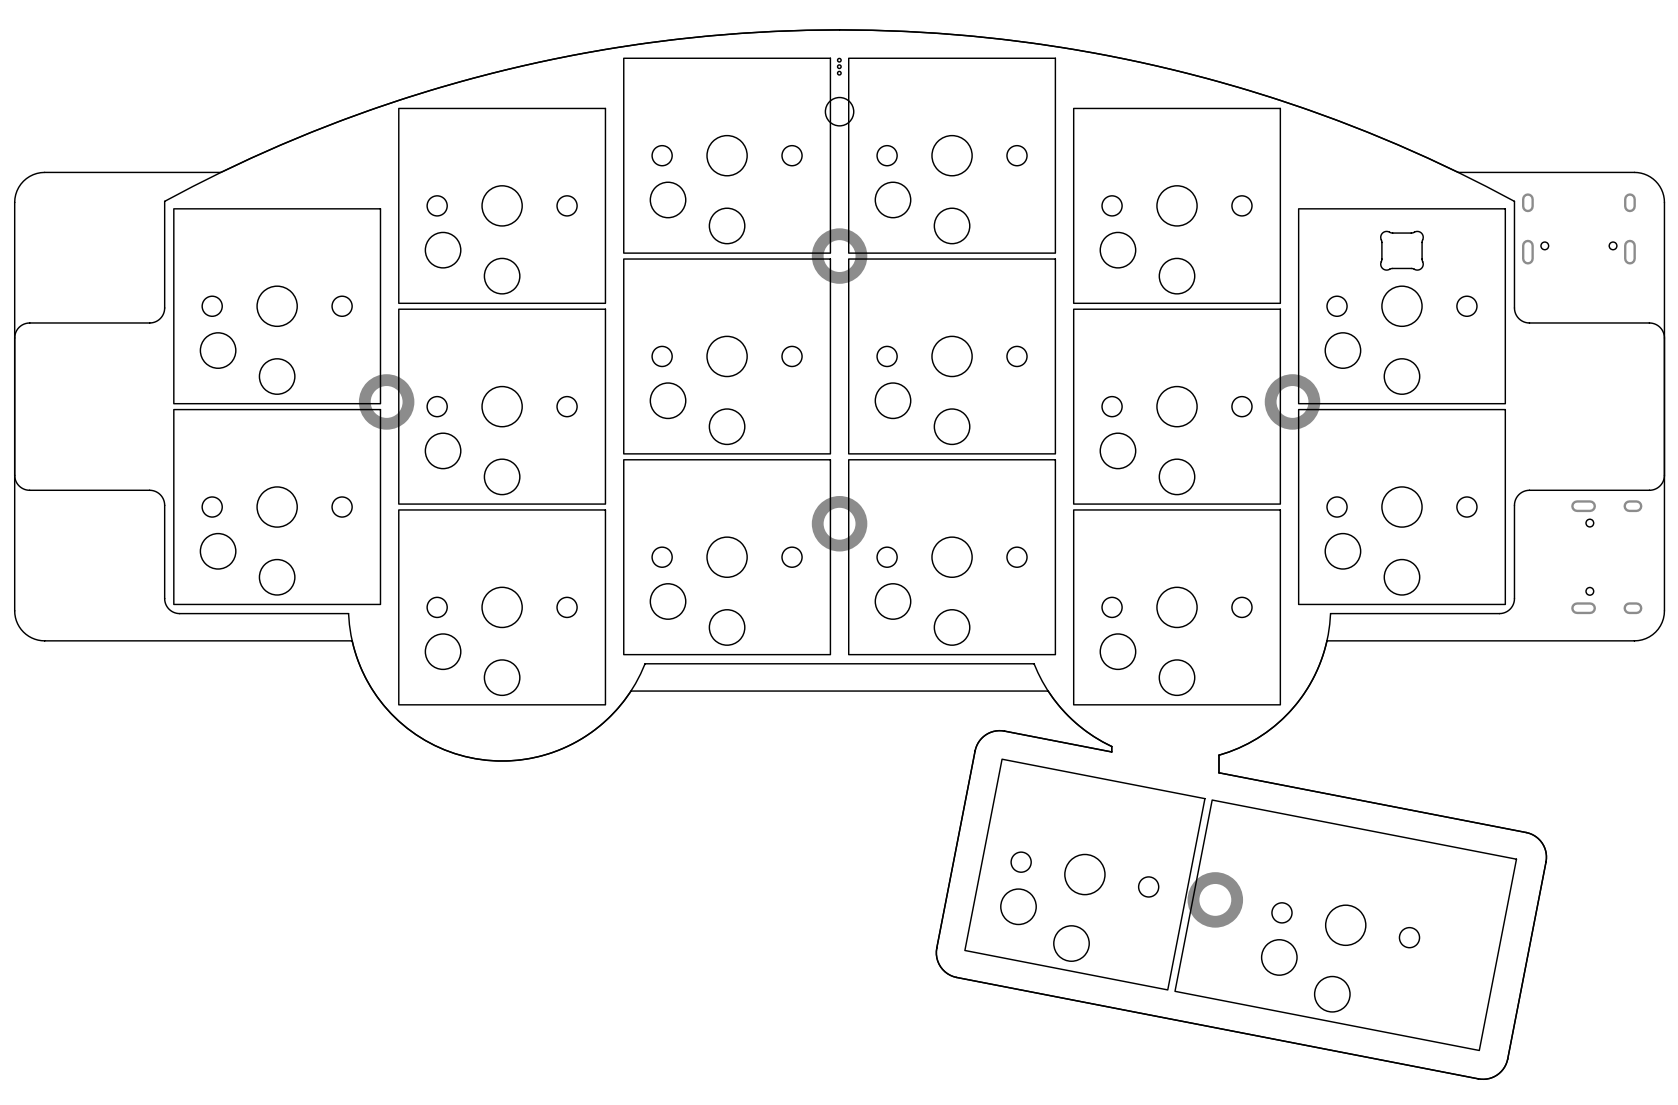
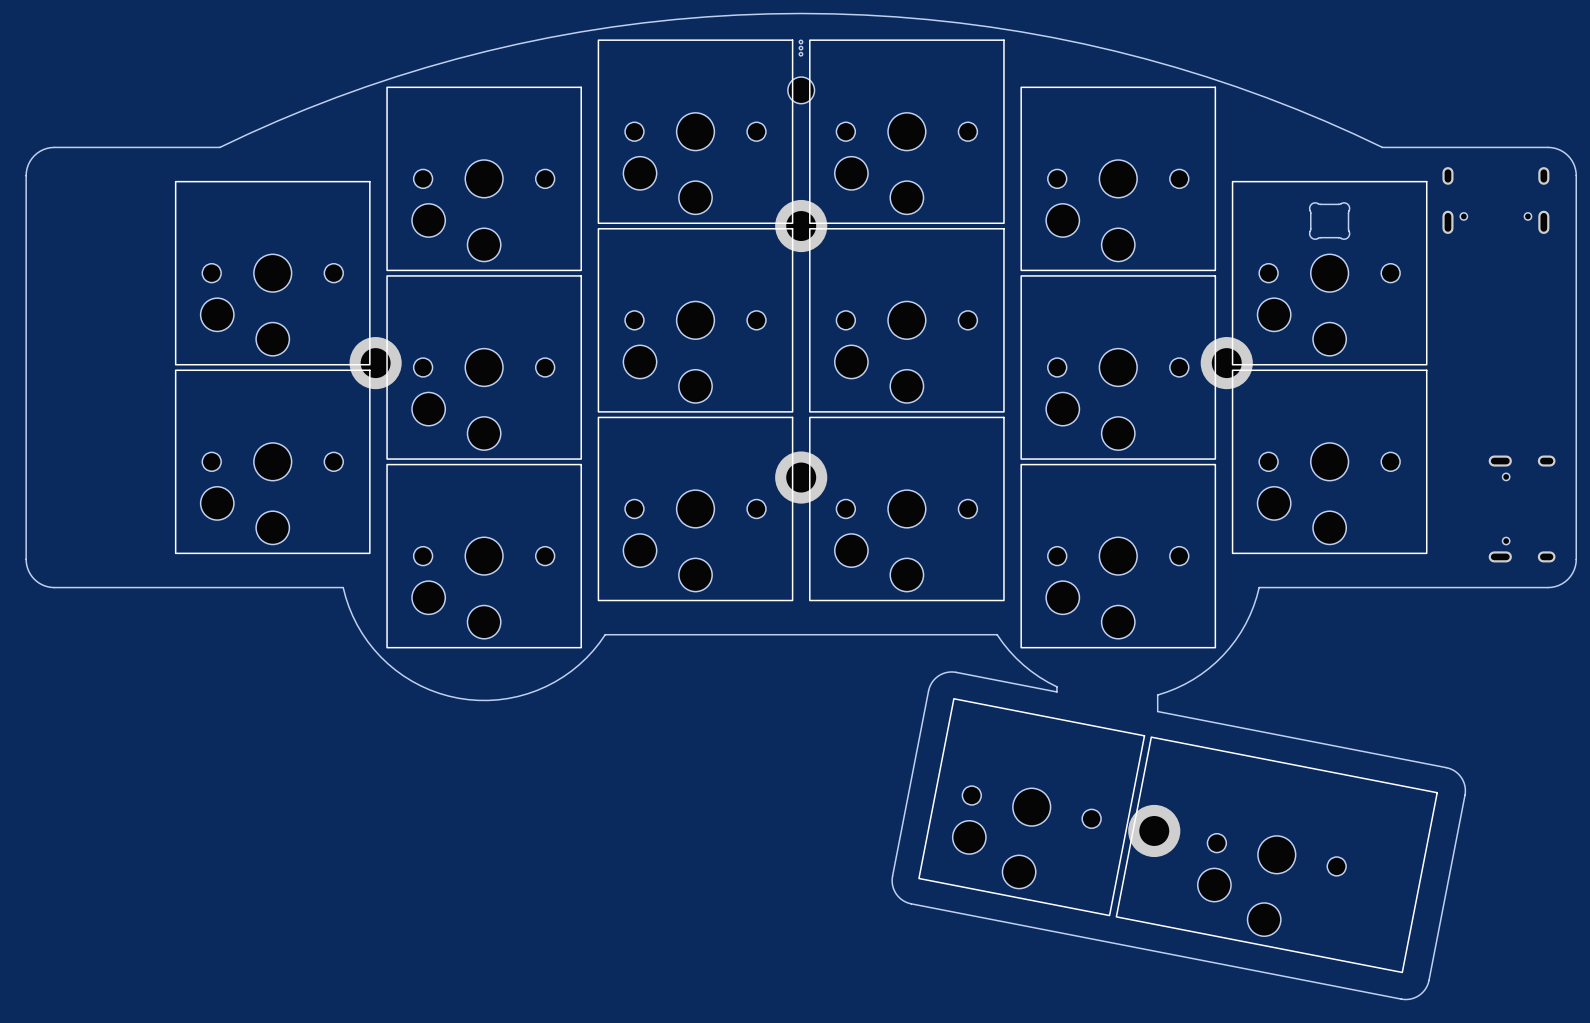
line: (839, 29) (967, 35) (1062, 47) (1187, 73) (1310, 110) (1428, 158) (1514, 201) (1514, 307) (1516, 315) (1521, 320) (1529, 322) (1651, 323) (1662, 330) (1664, 337) (1664, 475) (1660, 485) (1649, 490) (1529, 490) (1521, 492) (1517, 496) (1514, 503) (1514, 598) (1512, 606) (1508, 610) (1499, 613) (1330, 613) (1325, 645) (1319, 665) (1297, 702) (1266, 732) (1248, 743) (1218, 755) (1218, 772) (1526, 832) (1540, 840) (1545, 850) (1546, 861) (1507, 1059) (1503, 1069) (1497, 1075) (1489, 1078) (1478, 1078) (956, 977) (944, 971) (937, 960) (936, 948) (975, 750) (979, 740) (990, 732) (1001, 730) (1111, 751) (1111, 746) (1079, 725) (1058, 705) (1042, 681) (1034, 663) (645, 663) (629, 693) (616, 710) (600, 725) (572, 743) (552, 752) (531, 758) (498, 761) (476, 758) (455, 753) (434, 745) (415, 734) (390, 712) (370, 686) (360, 667) (351, 635) (348, 613) (179, 613) (170, 610) (164, 598) (164, 503) (157, 492) (149, 490) (28, 490) (20, 487) (16, 481) (14, 337) (16, 330) (22, 325) (27, 323) (149, 322) (159, 319) (164, 307) (164, 201) (250, 158) (309, 133) (399, 100) (491, 73) (585, 52) (680, 38) (743, 33) (839, 29) -> none

